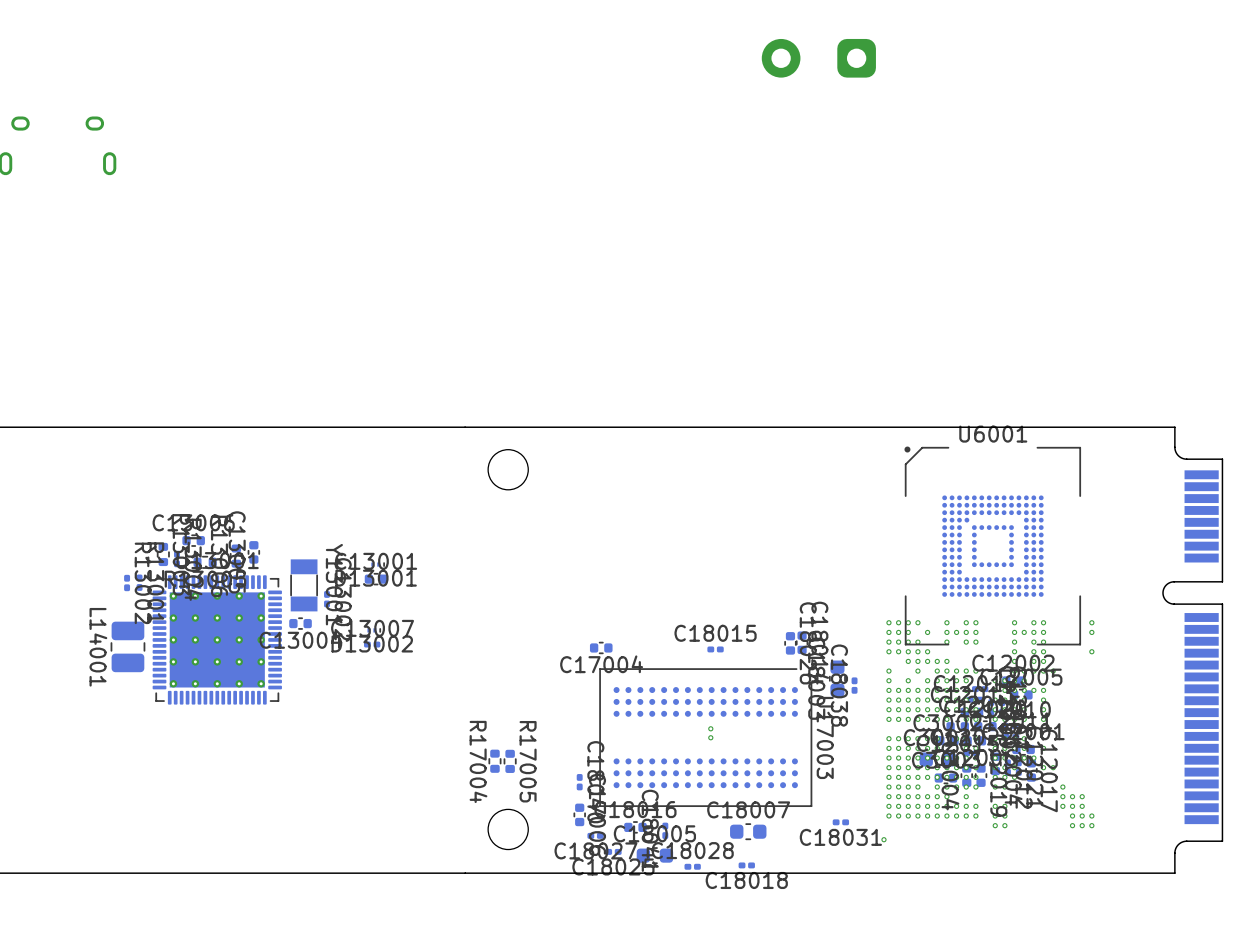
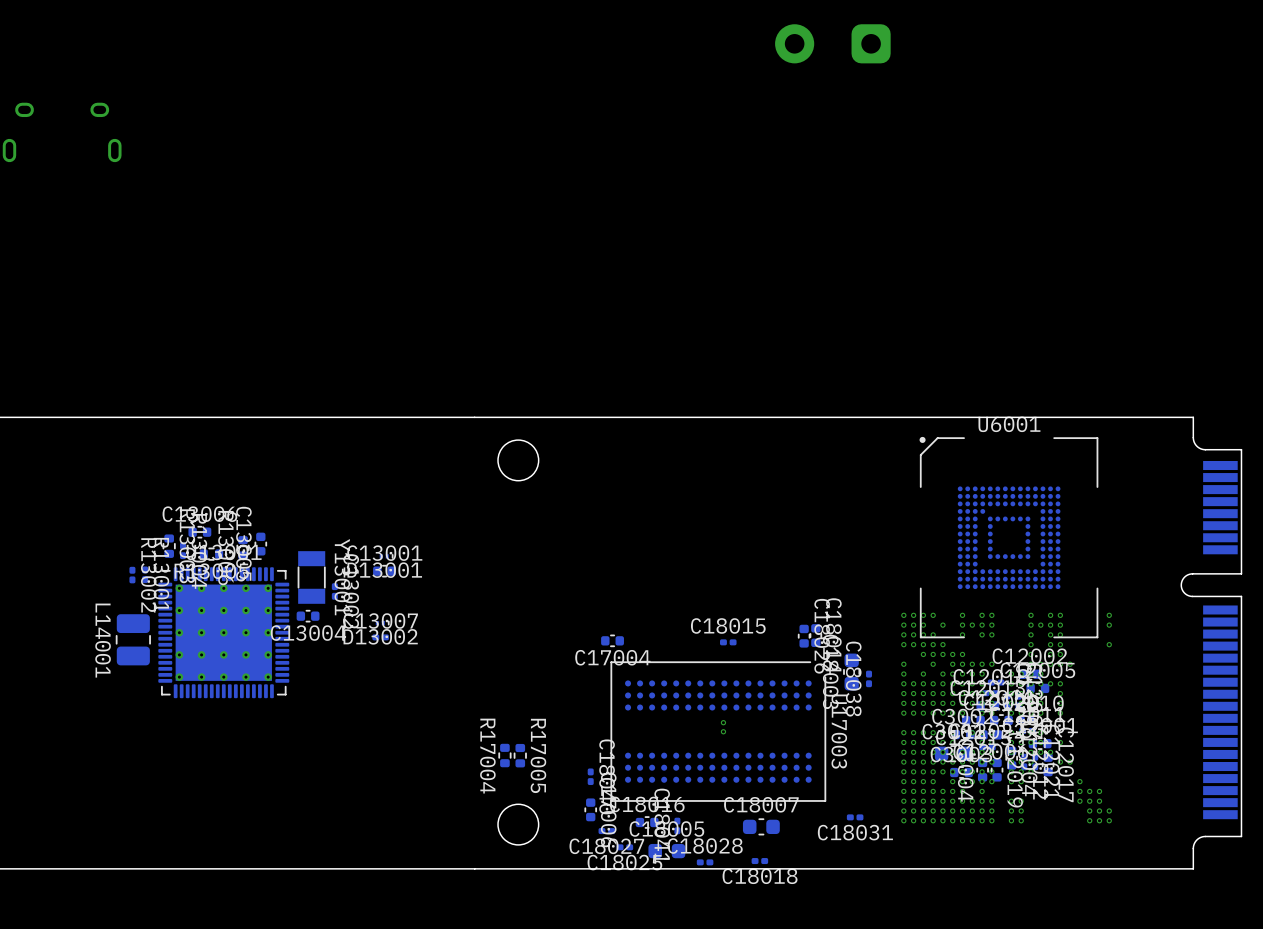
via: none -> (903, 820)
via: none -> (913, 820)
via: none -> (923, 820)
via: none -> (933, 820)
via: none -> (942, 820)
via: none -> (952, 820)
via: none -> (962, 820)
via: none -> (972, 820)
via: none -> (982, 820)
via: none -> (991, 820)
via: (883, 839) -> none

